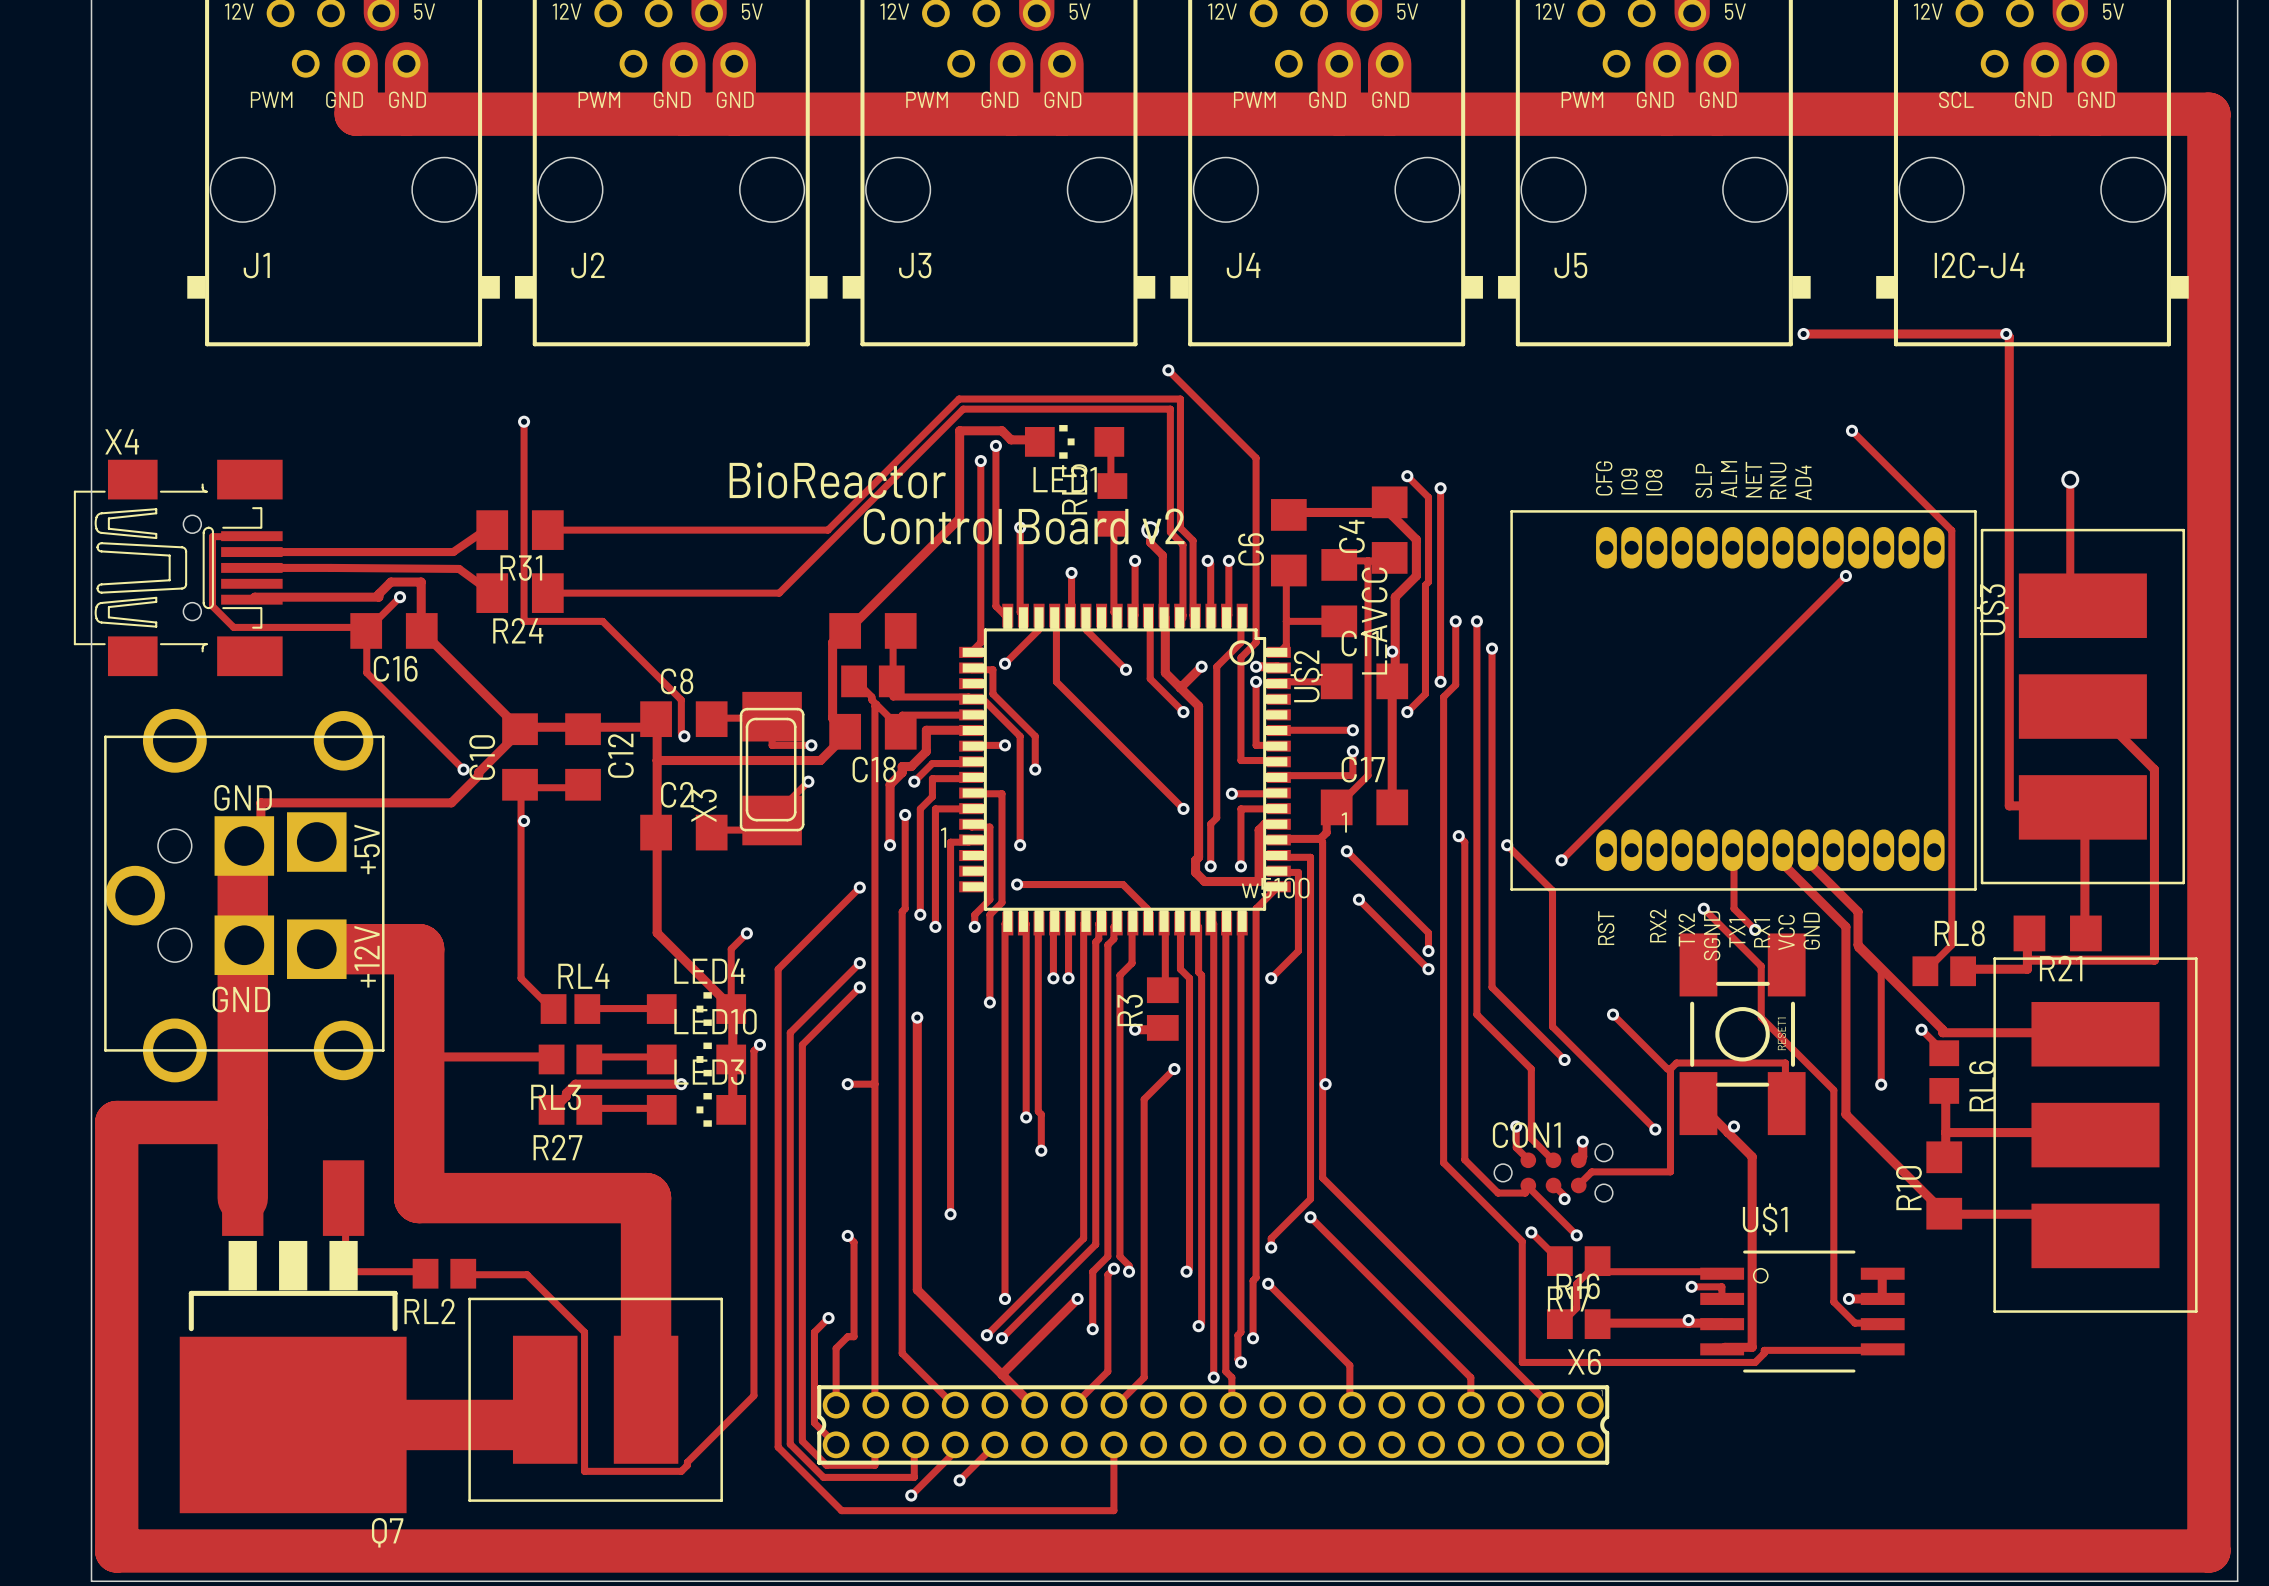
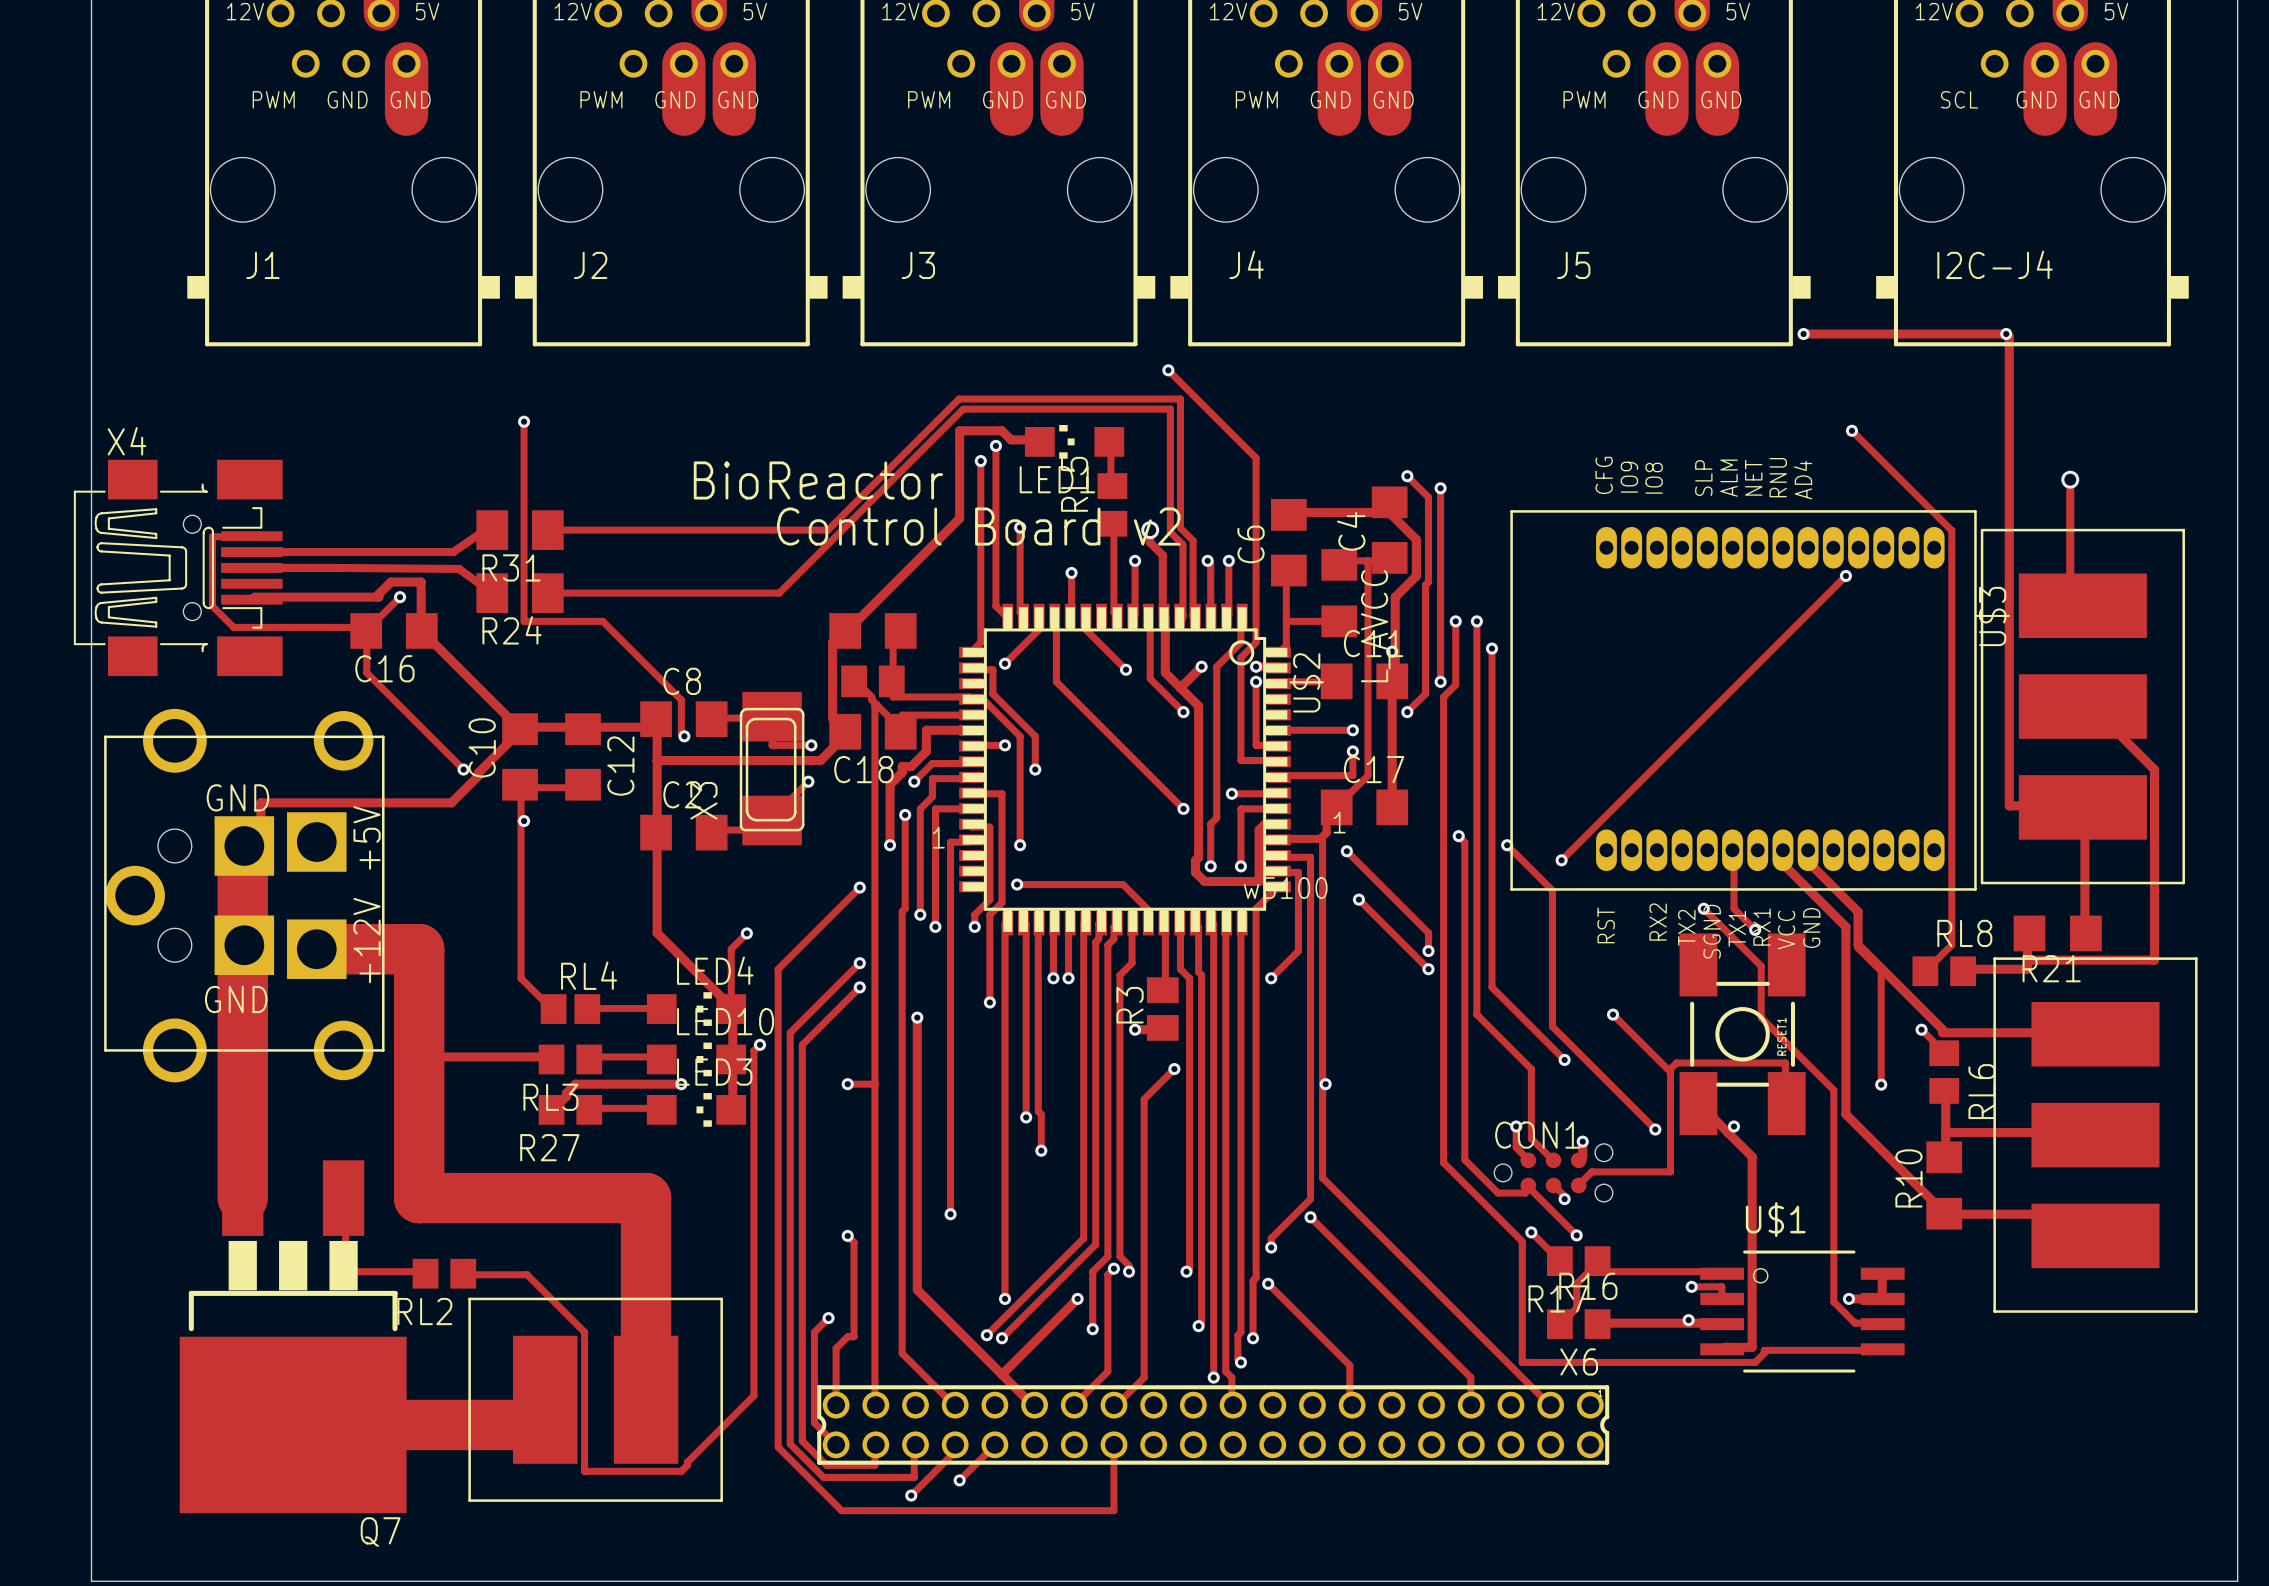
track: (356, 63) (356, 114) (2208, 114) (2208, 1551) (116, 1551) (116, 1122) (242, 1122) -> none

